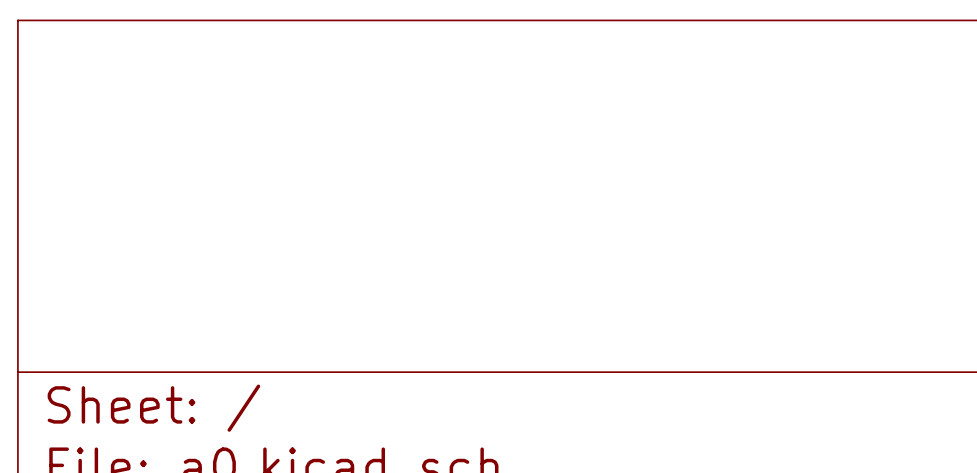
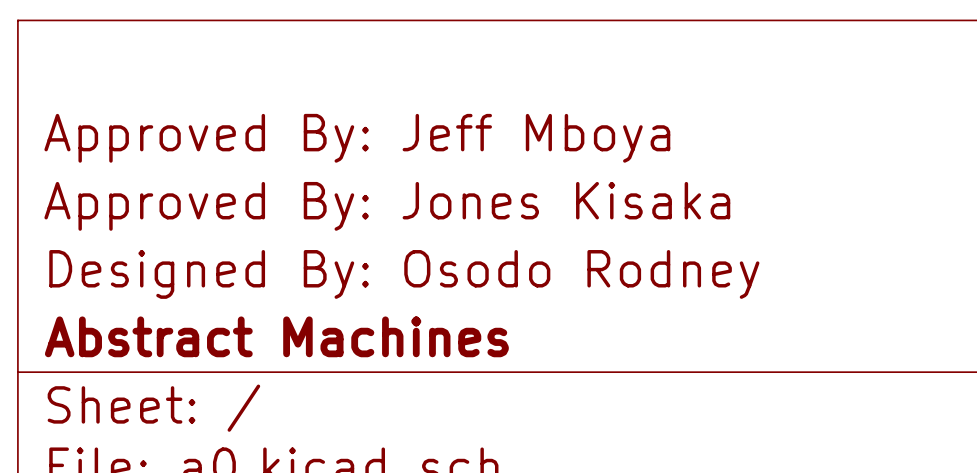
title block: none -> Approved By: Jeff Mboya (357, 138)
title block: none -> Approved By: Jones Kisaka (387, 206)
title block: none -> Designed By: Osodo Rodney (404, 274)
title block: none -> Abstract Machines (276, 336)

